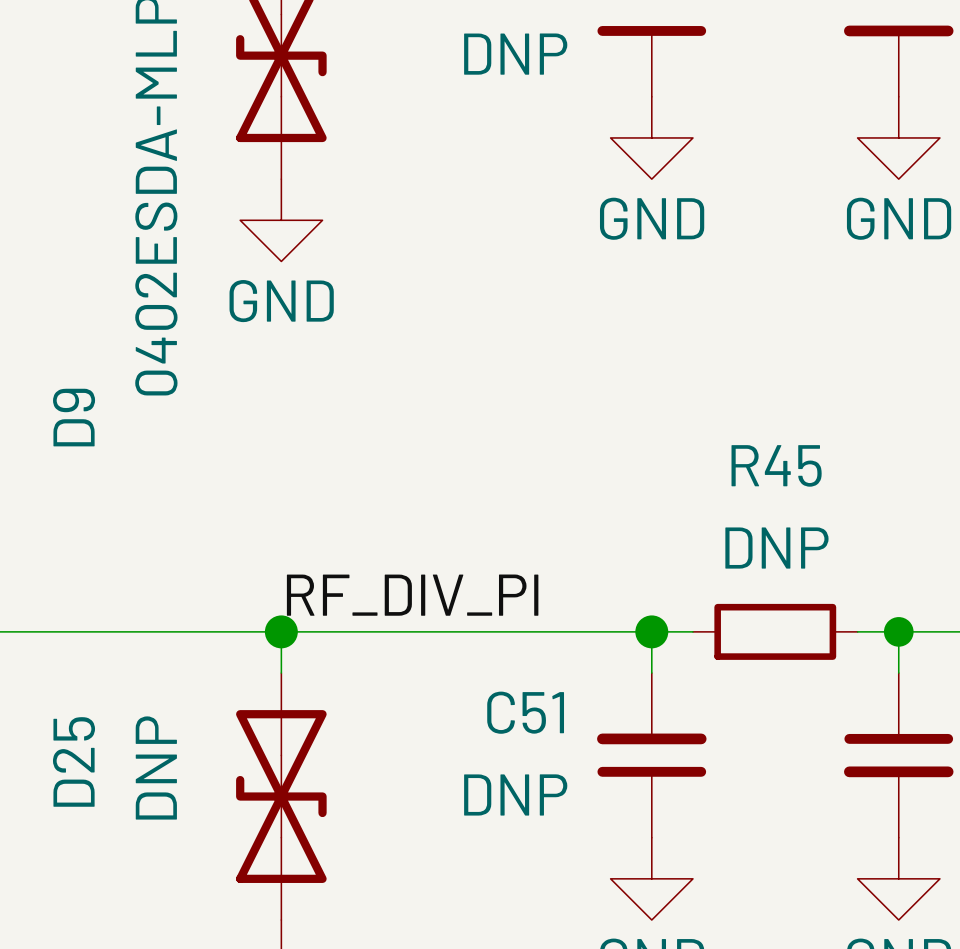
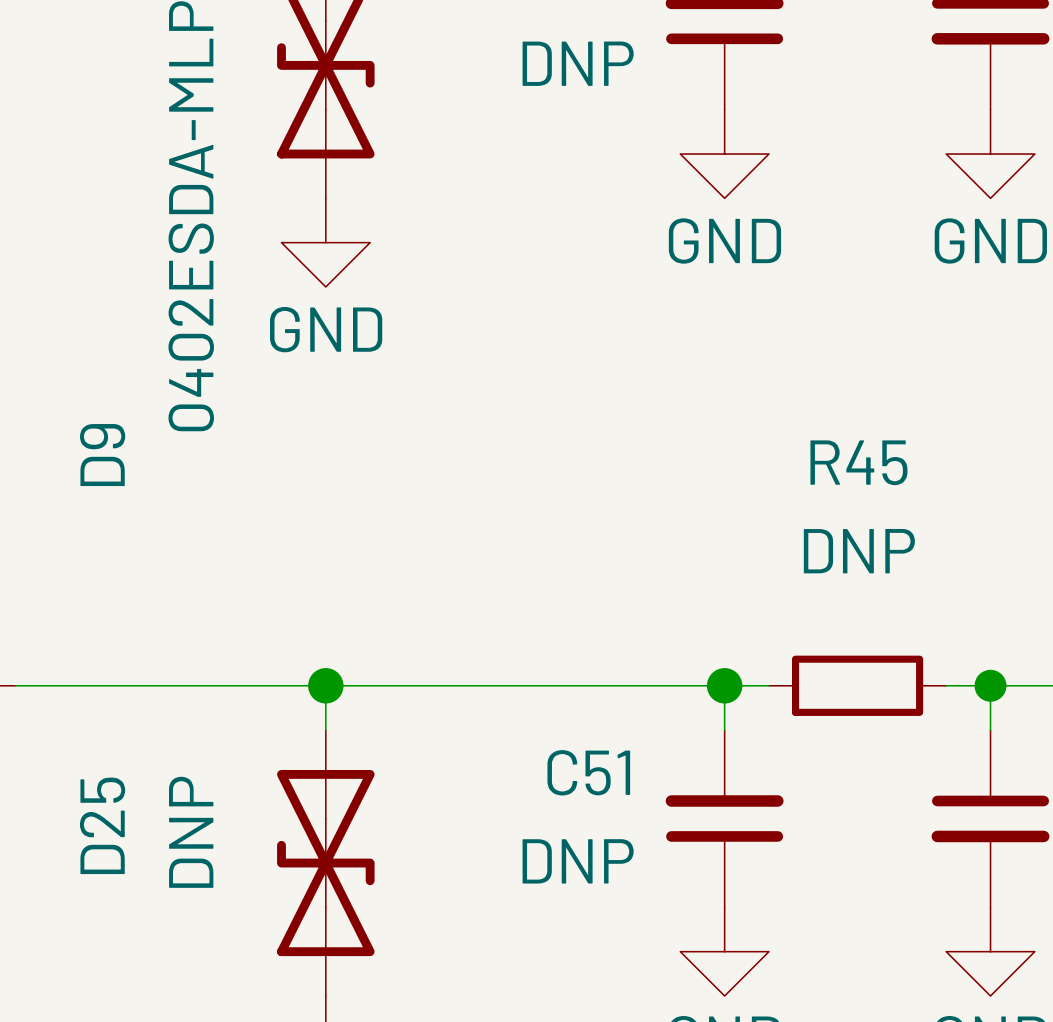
R45 name position: R45 (776, 465) -> R45 (858, 462)
R45 value position: DNP (776, 548) -> DNP (859, 551)
label: RF_DIV_PI (412, 595) -> none

